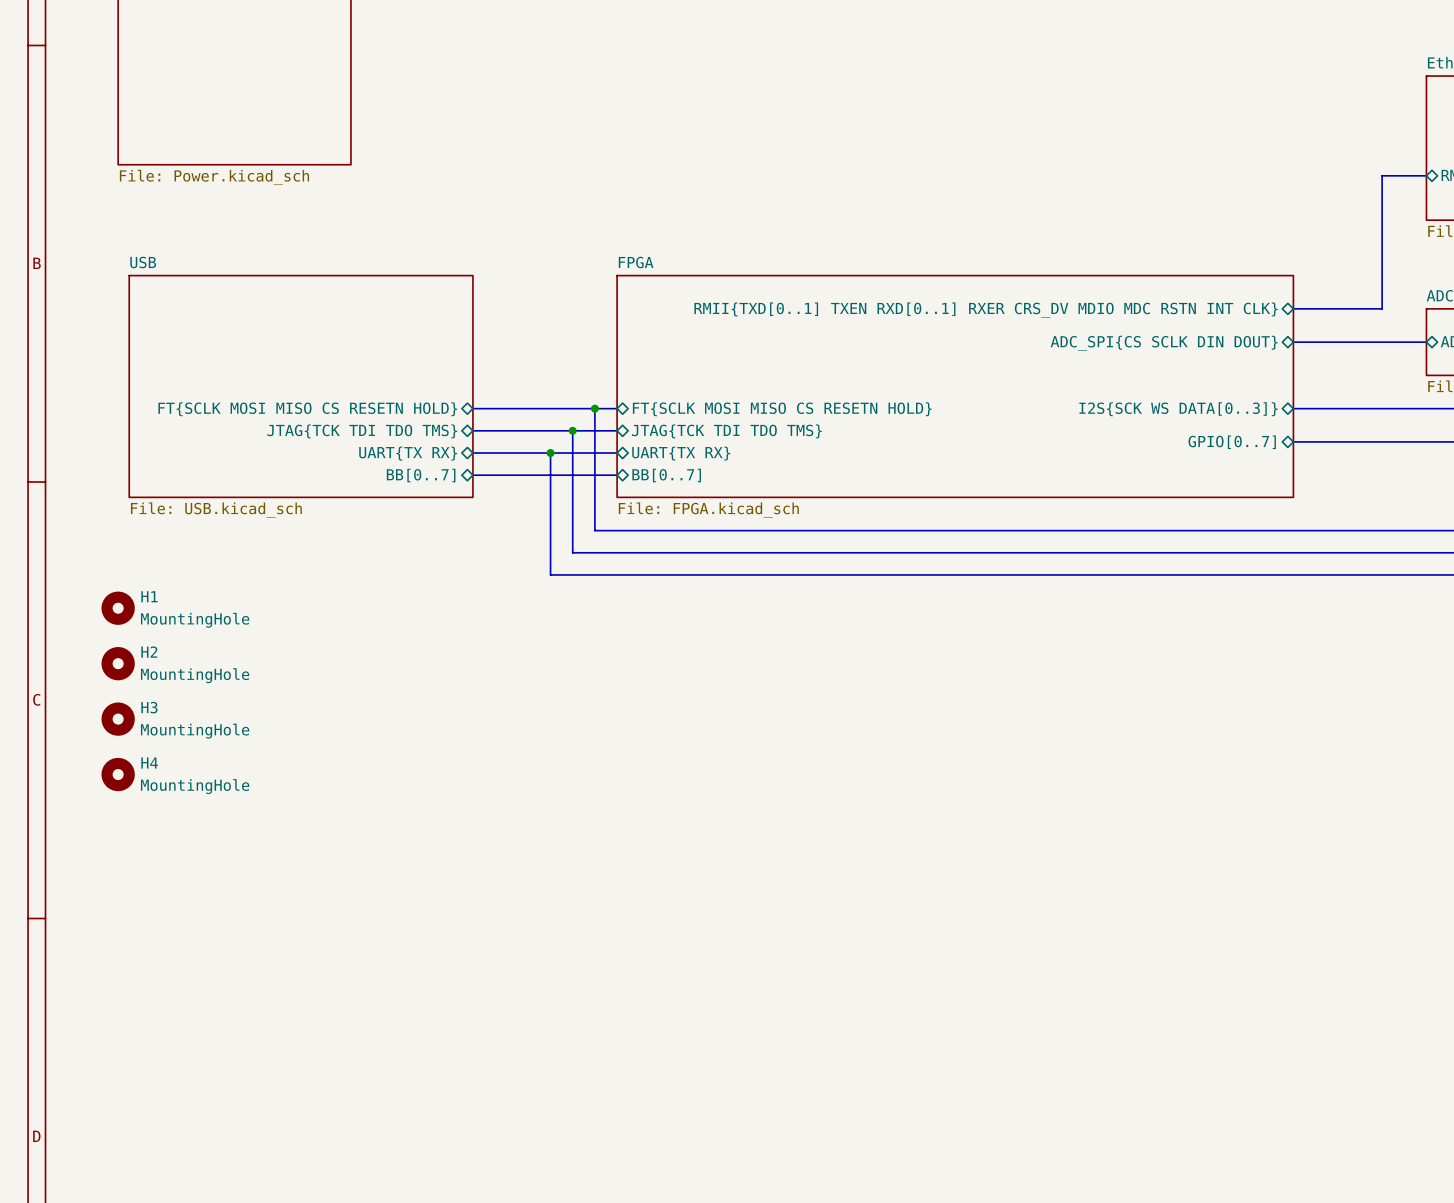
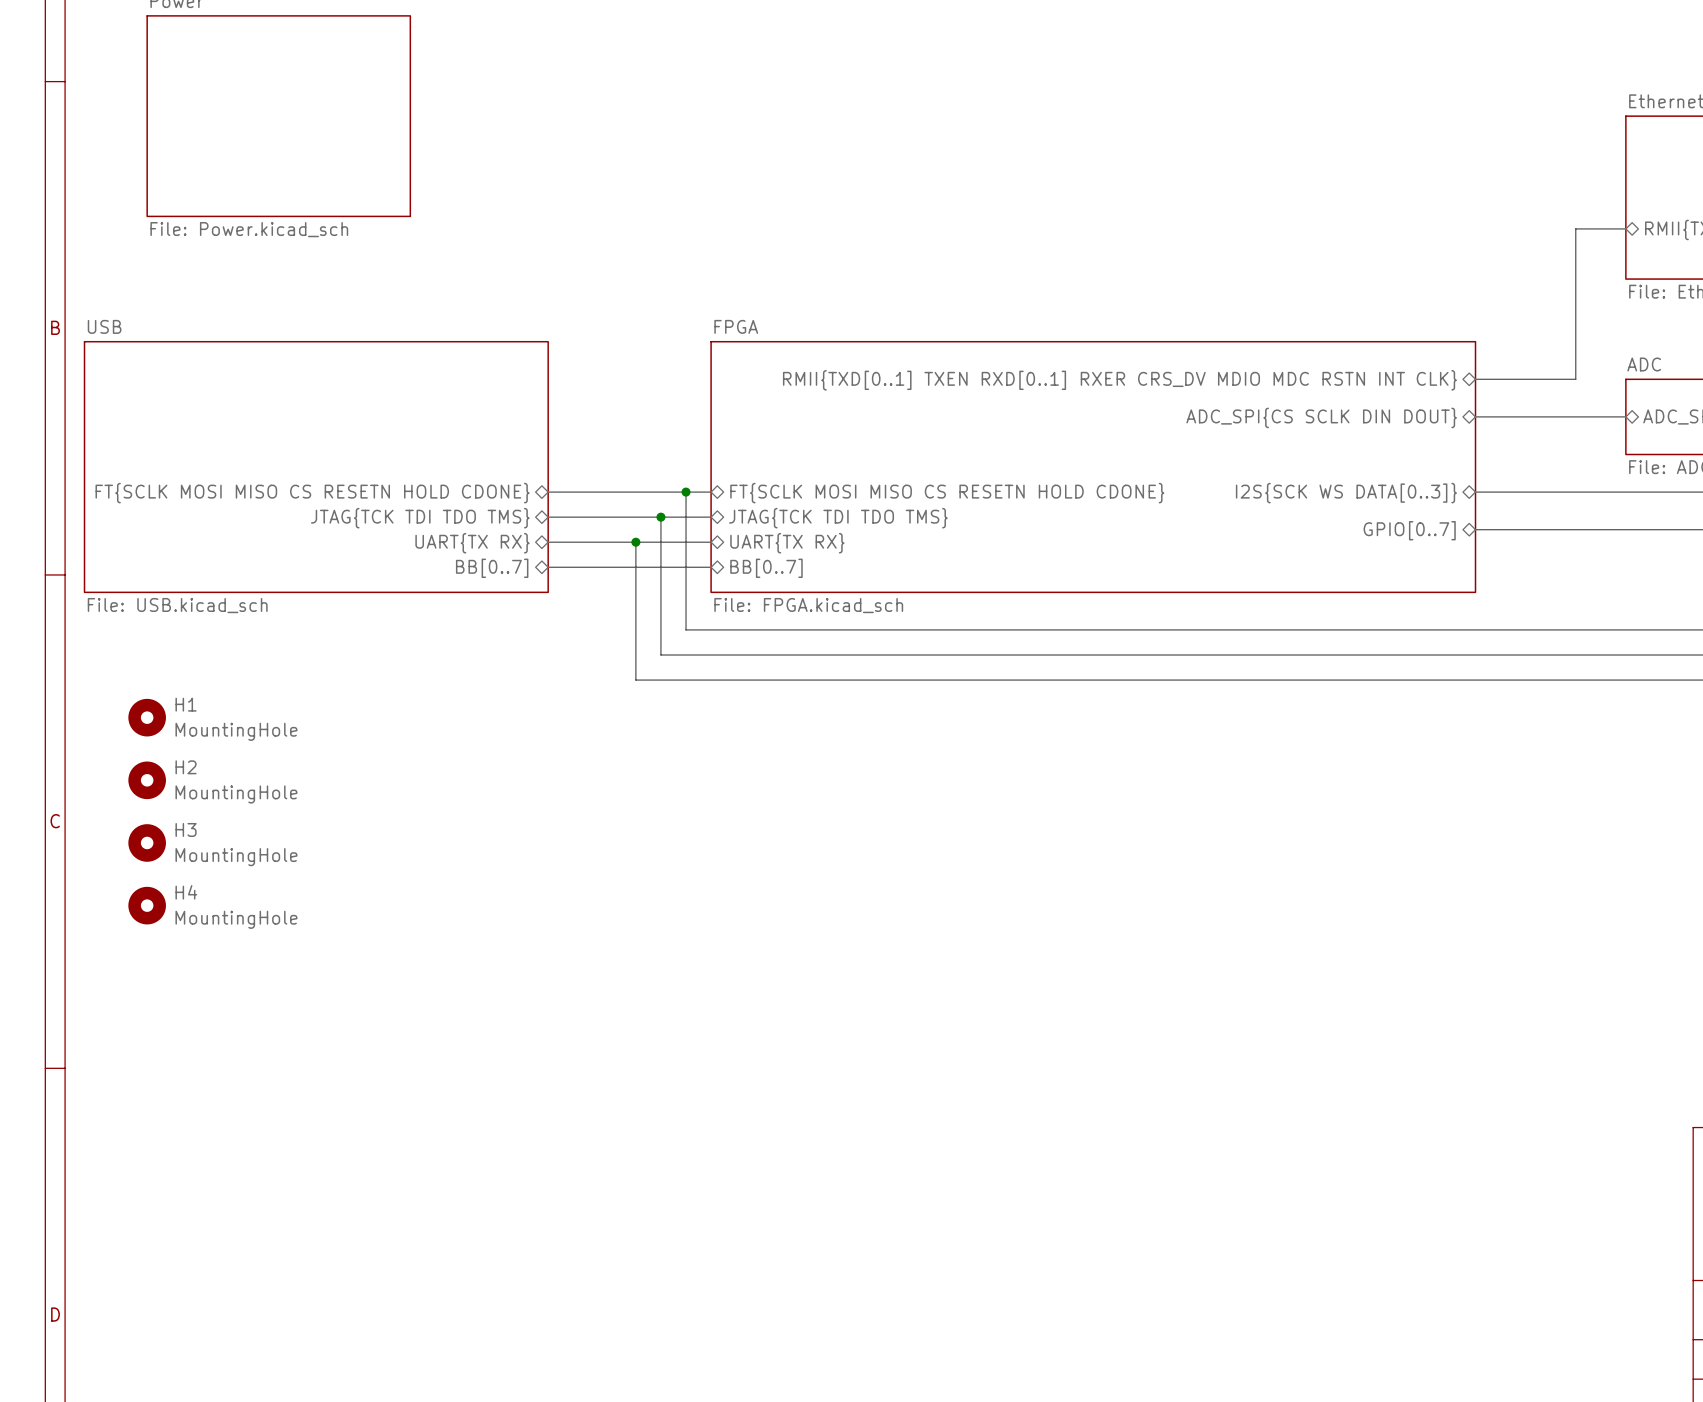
sheet USB: none -> File: USB.kicad_sch (316, 467)
sheet USB: File: USB.kicad_sch (301, 386) -> none
sheet pin: FT{SCLK MOSI MISO CS RESETN HOLD} (307, 409) -> FT{SCLK MOSI MISO CS RESETN HOLD CDONE} (312, 493)
sheet pin: FT{SCLK MOSI MISO CS RESETN HOLD} (782, 409) -> FT{SCLK MOSI MISO CS RESETN HOLD CDONE} (947, 493)

